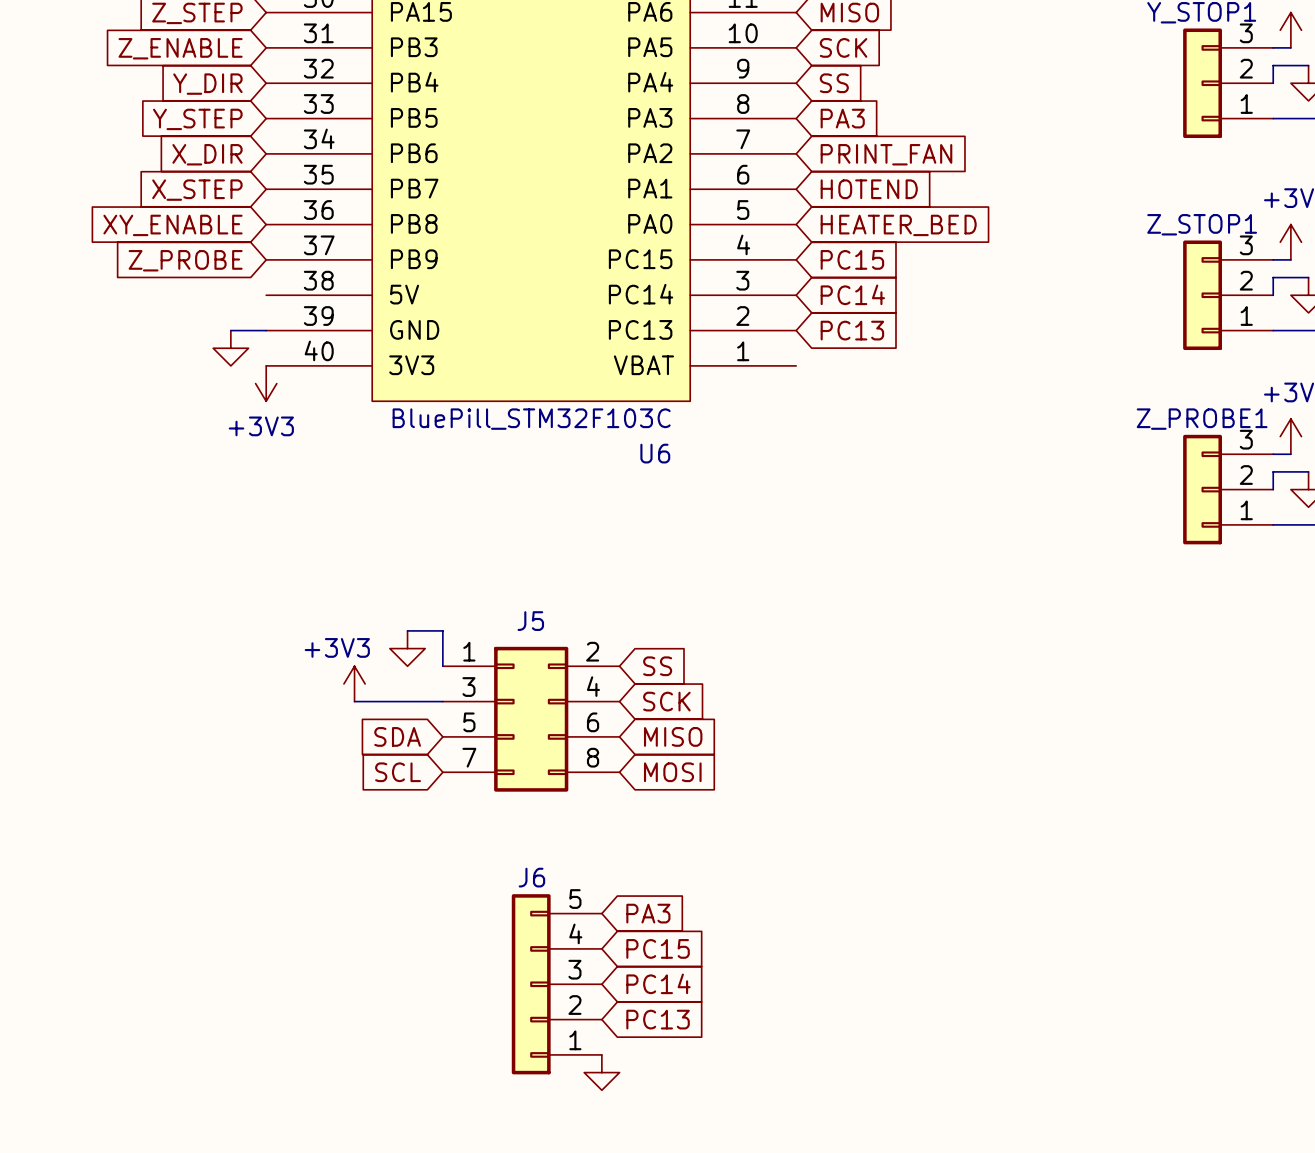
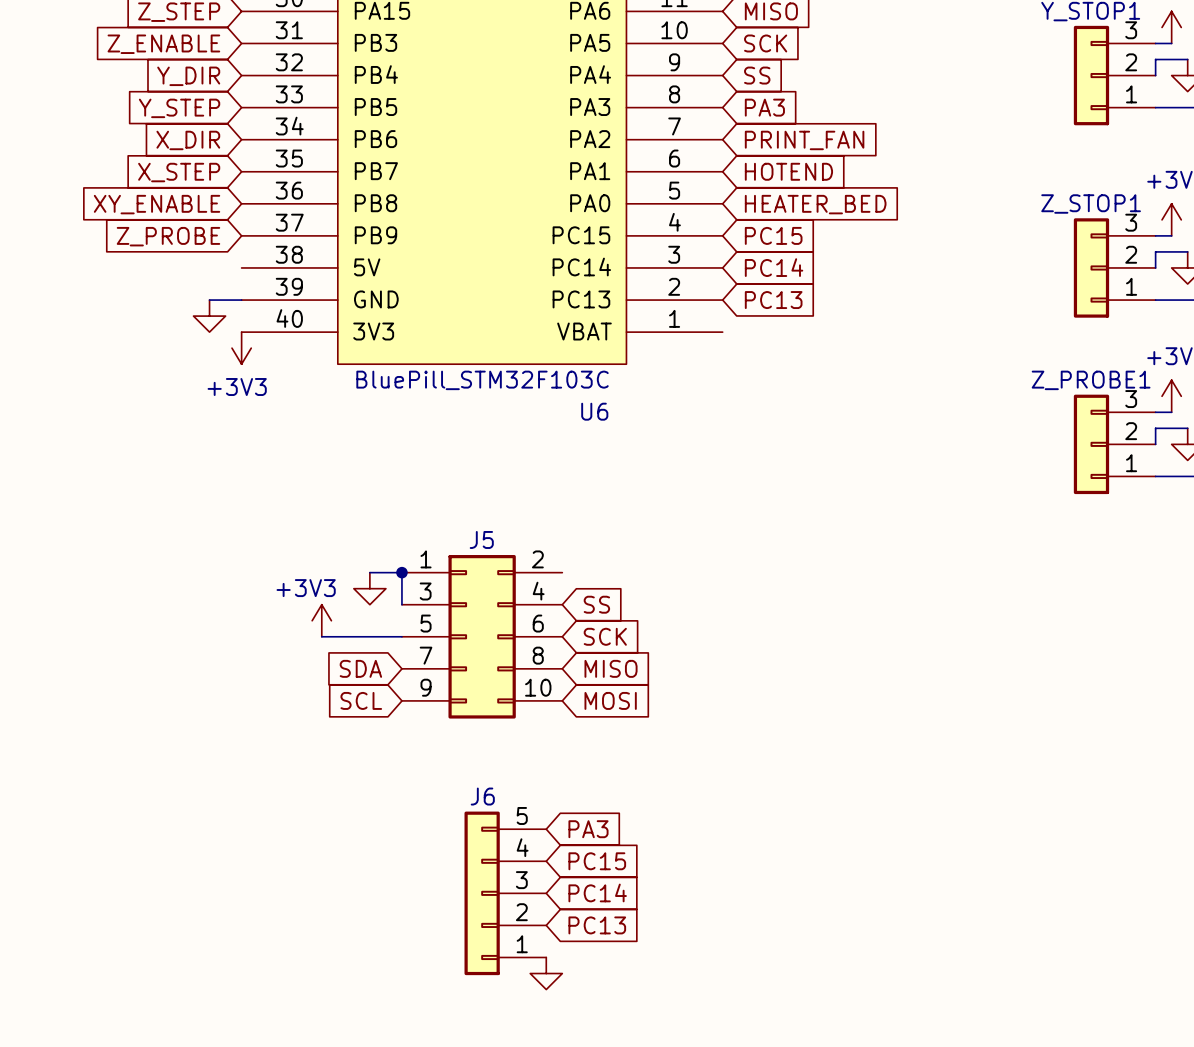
junction: none -> (401, 572)
J5 symbol: [442, 646, 620, 792] -> [401, 555, 563, 719]

